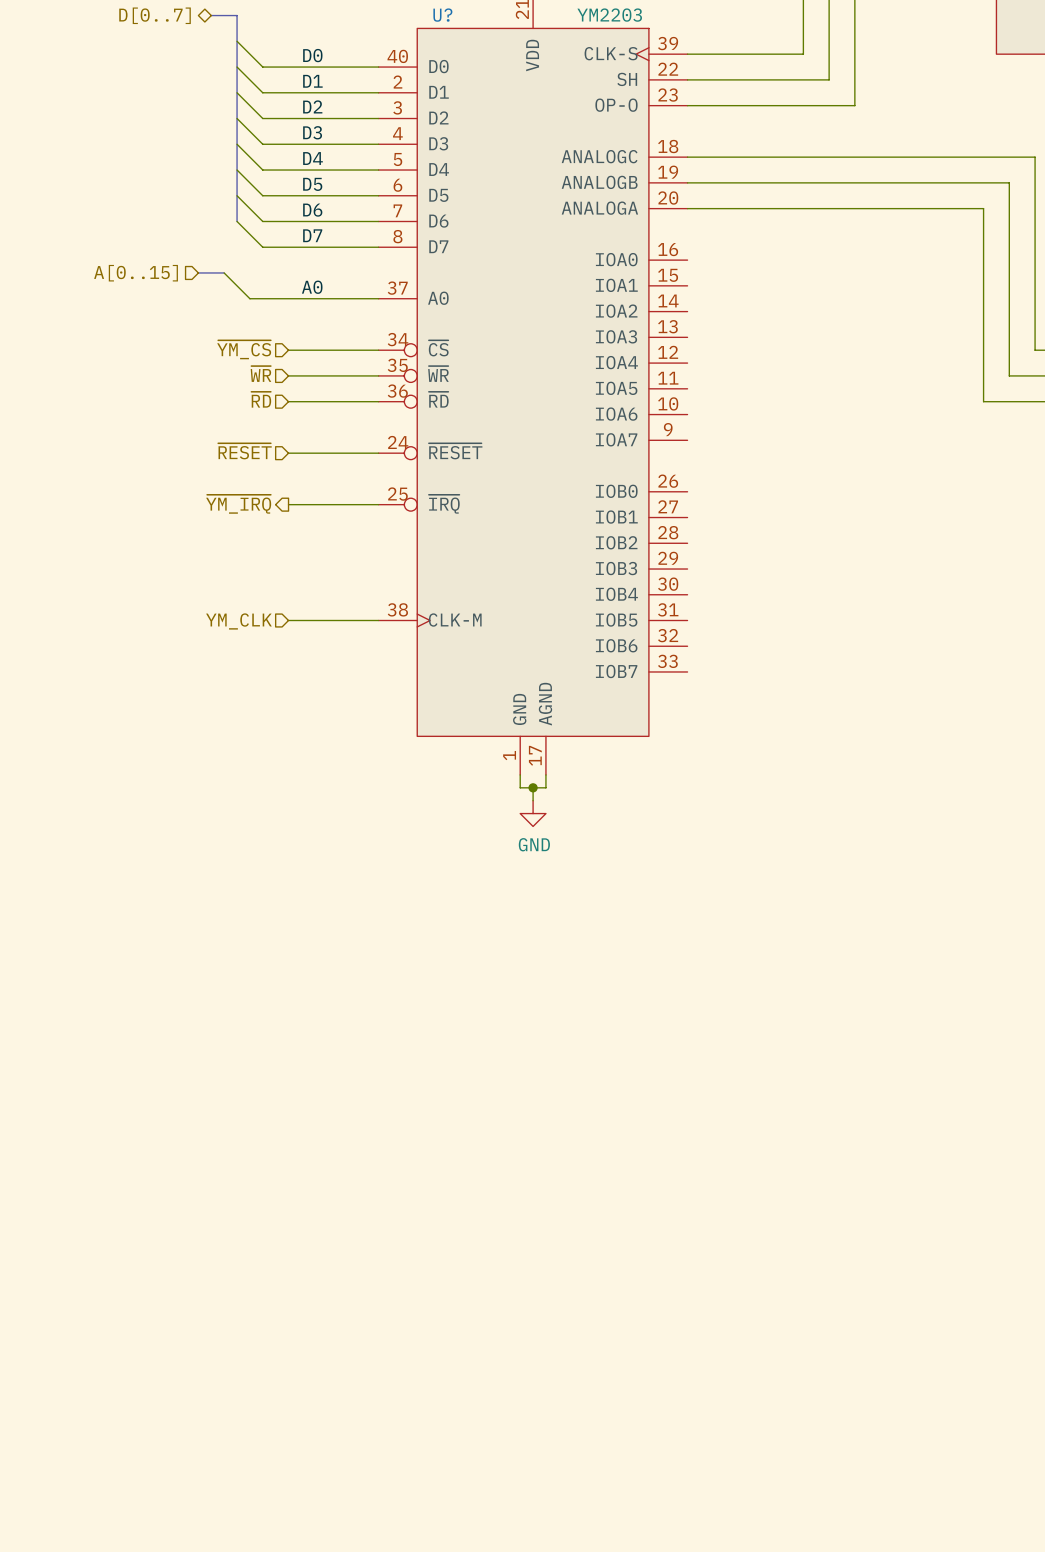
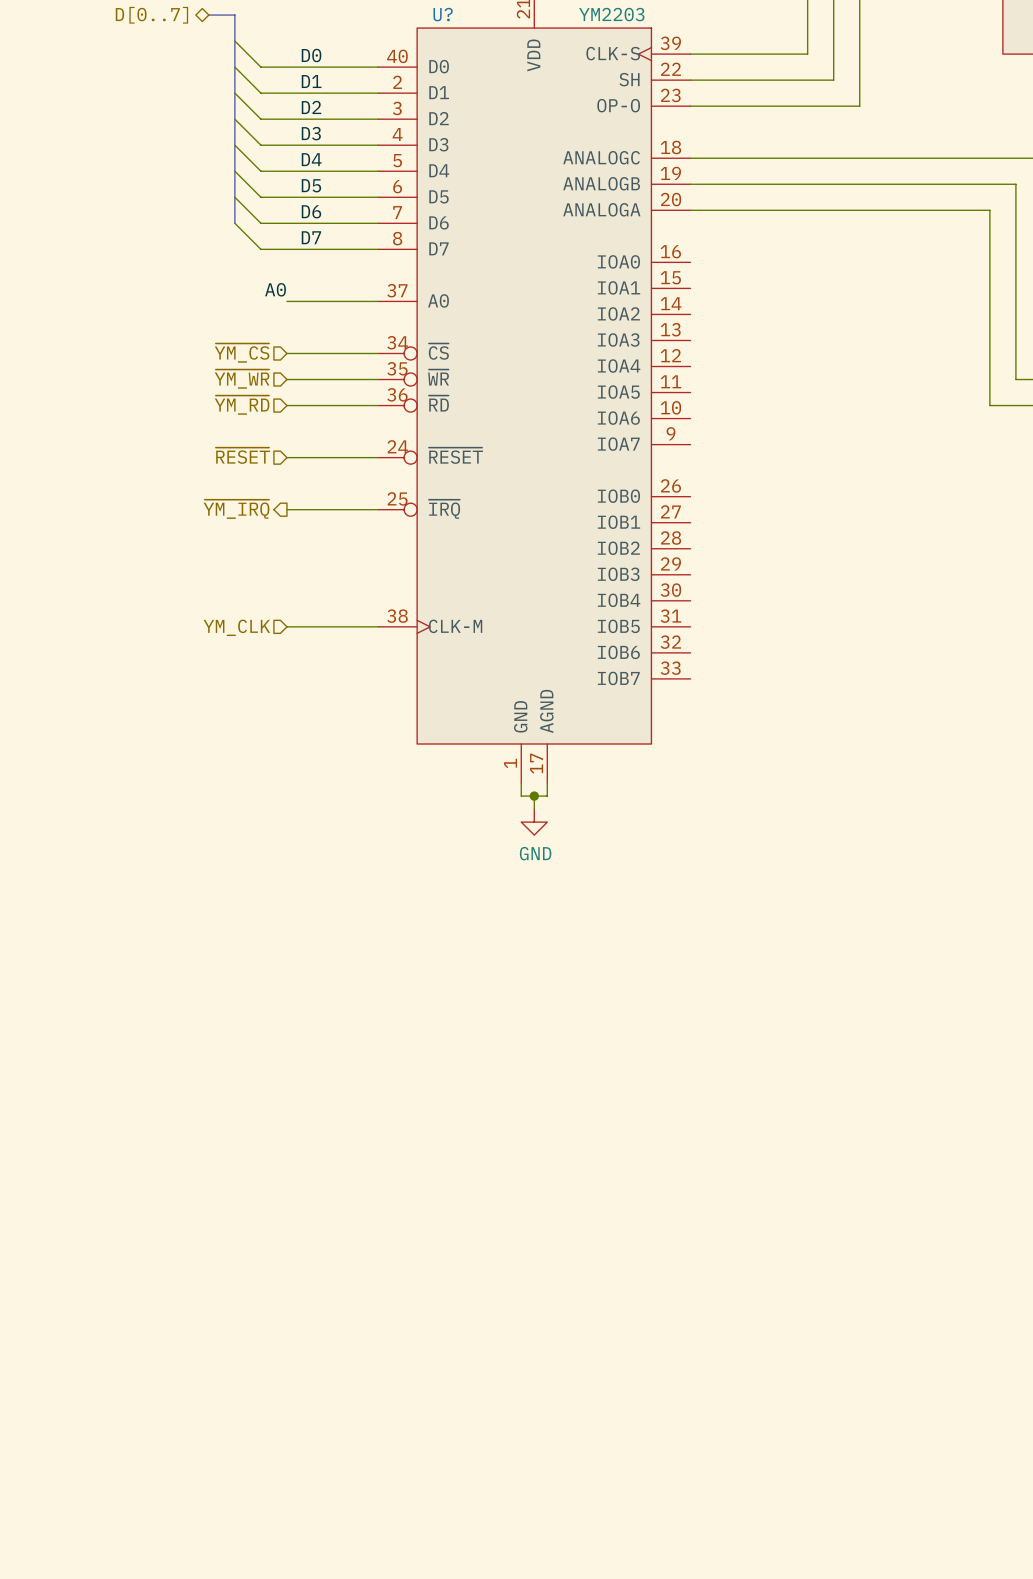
bus: (198, 272) (224, 272) -> none
wire: (224, 272) (249, 298) (288, 298) -> none
hierarchical label: A[0..15] (136, 273) -> none
label position: A0 (312, 287) -> A0 (275, 289)
hierarchical label: ~{WR} (260, 373) -> ~{YM_WR} (242, 379)
hierarchical label: ~{RD} (261, 399) -> ~{YM_RD} (242, 405)

